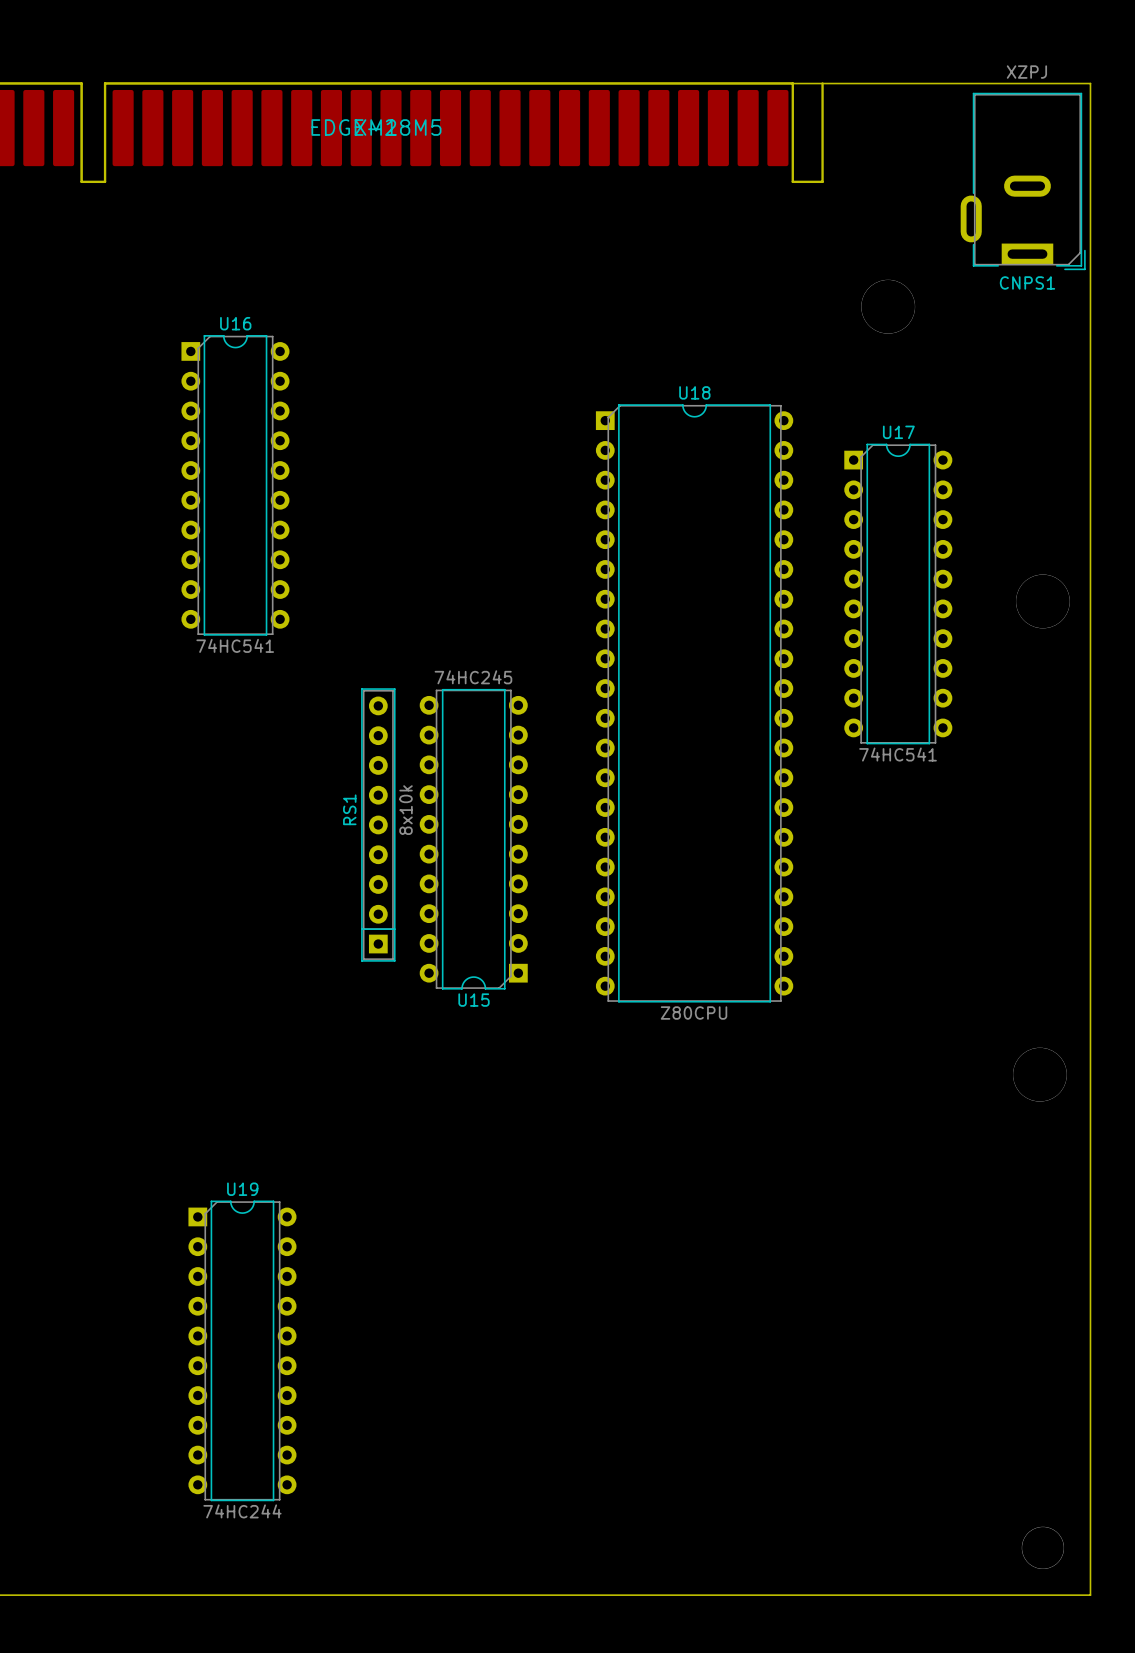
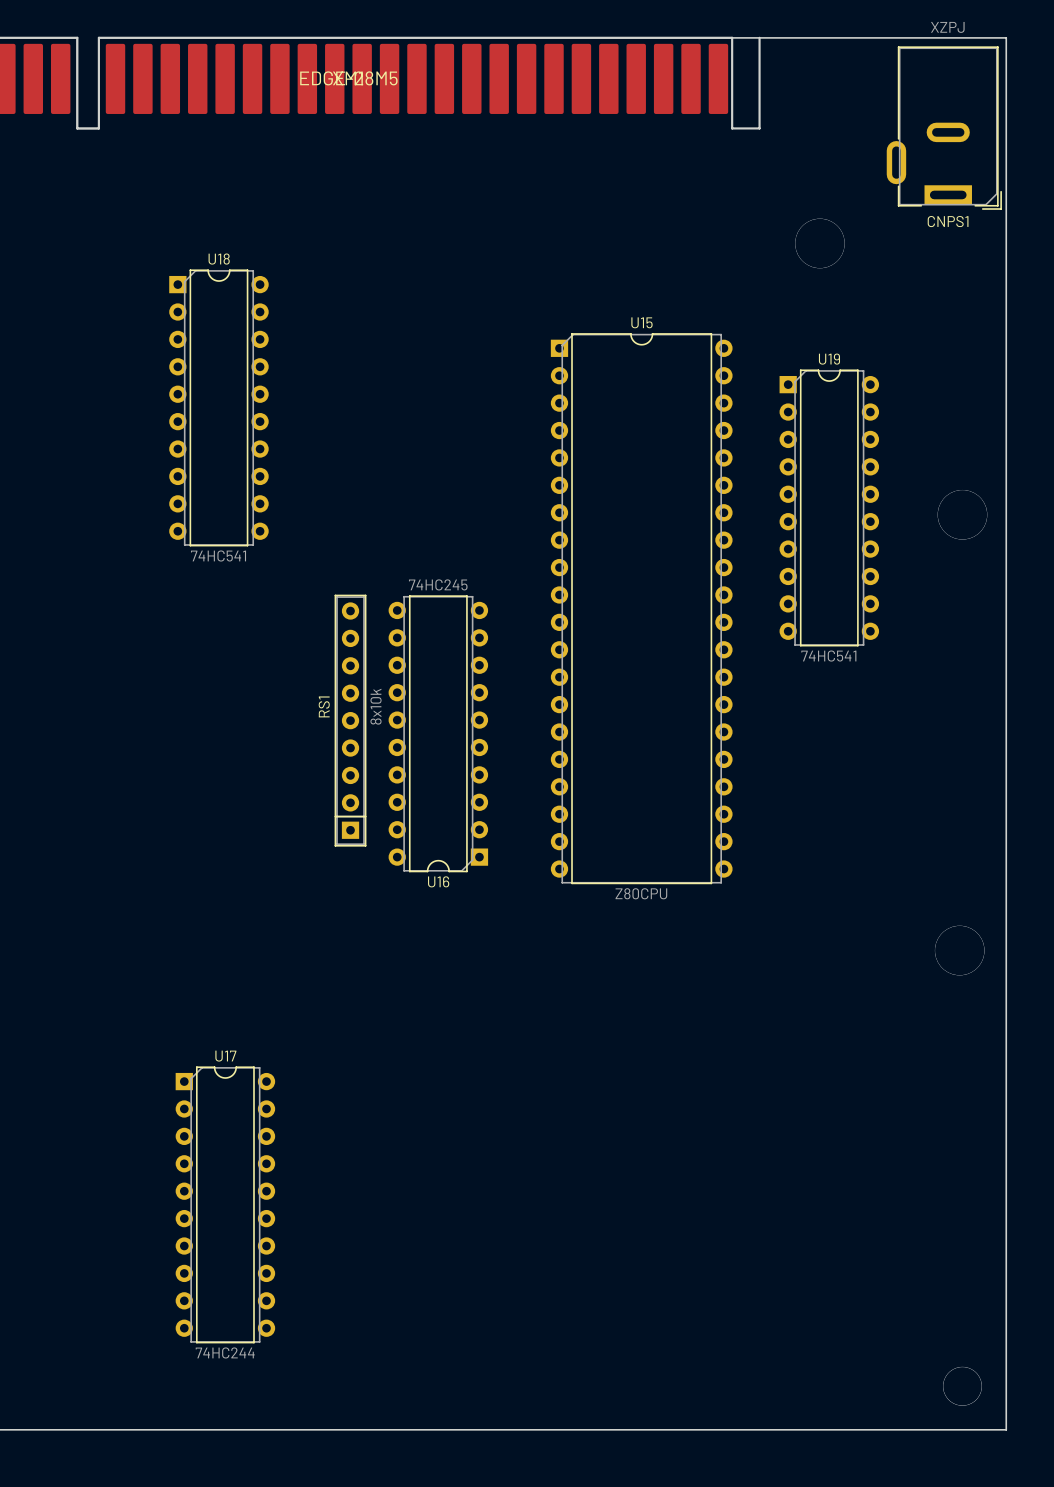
U16 name: U16 (235, 323) -> U18 (219, 259)
U18 name: U18 (694, 392) -> U15 (641, 322)
U17 name: U17 (898, 432) -> U19 (829, 359)
U15 name: U15 (474, 1000) -> U16 (438, 881)
U19 name: U19 (242, 1189) -> U17 (225, 1056)

